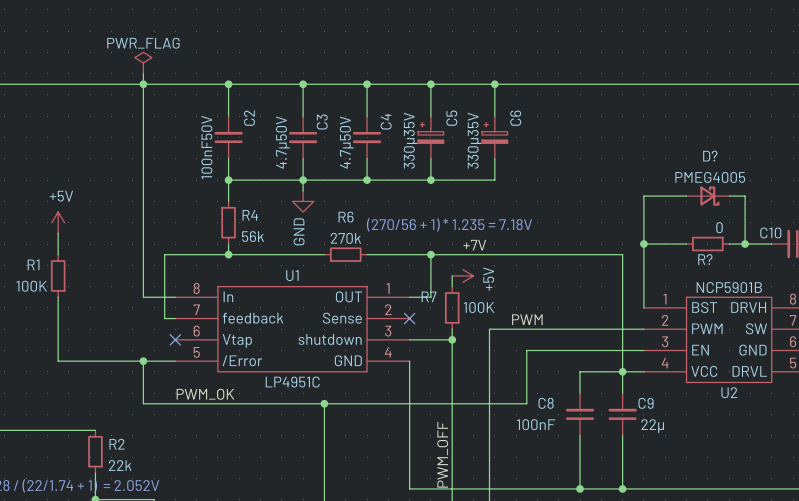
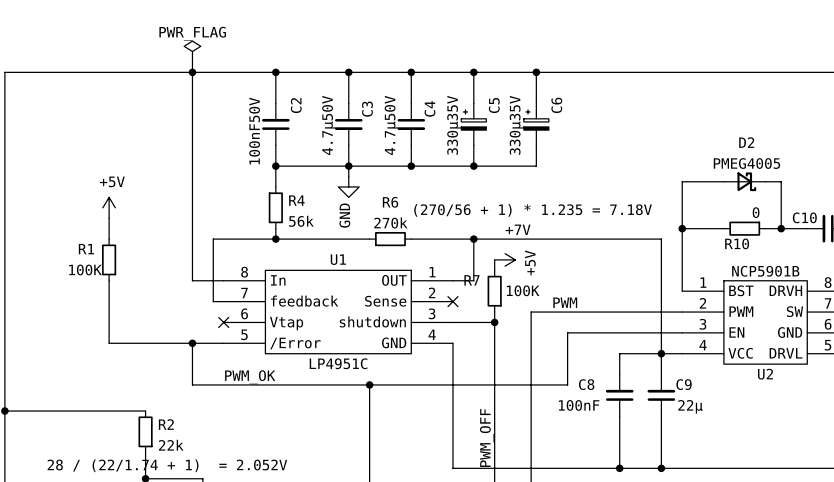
D? name: D? (710, 156) -> D2 (746, 142)
R? name: R? (705, 259) -> R10 (737, 243)

